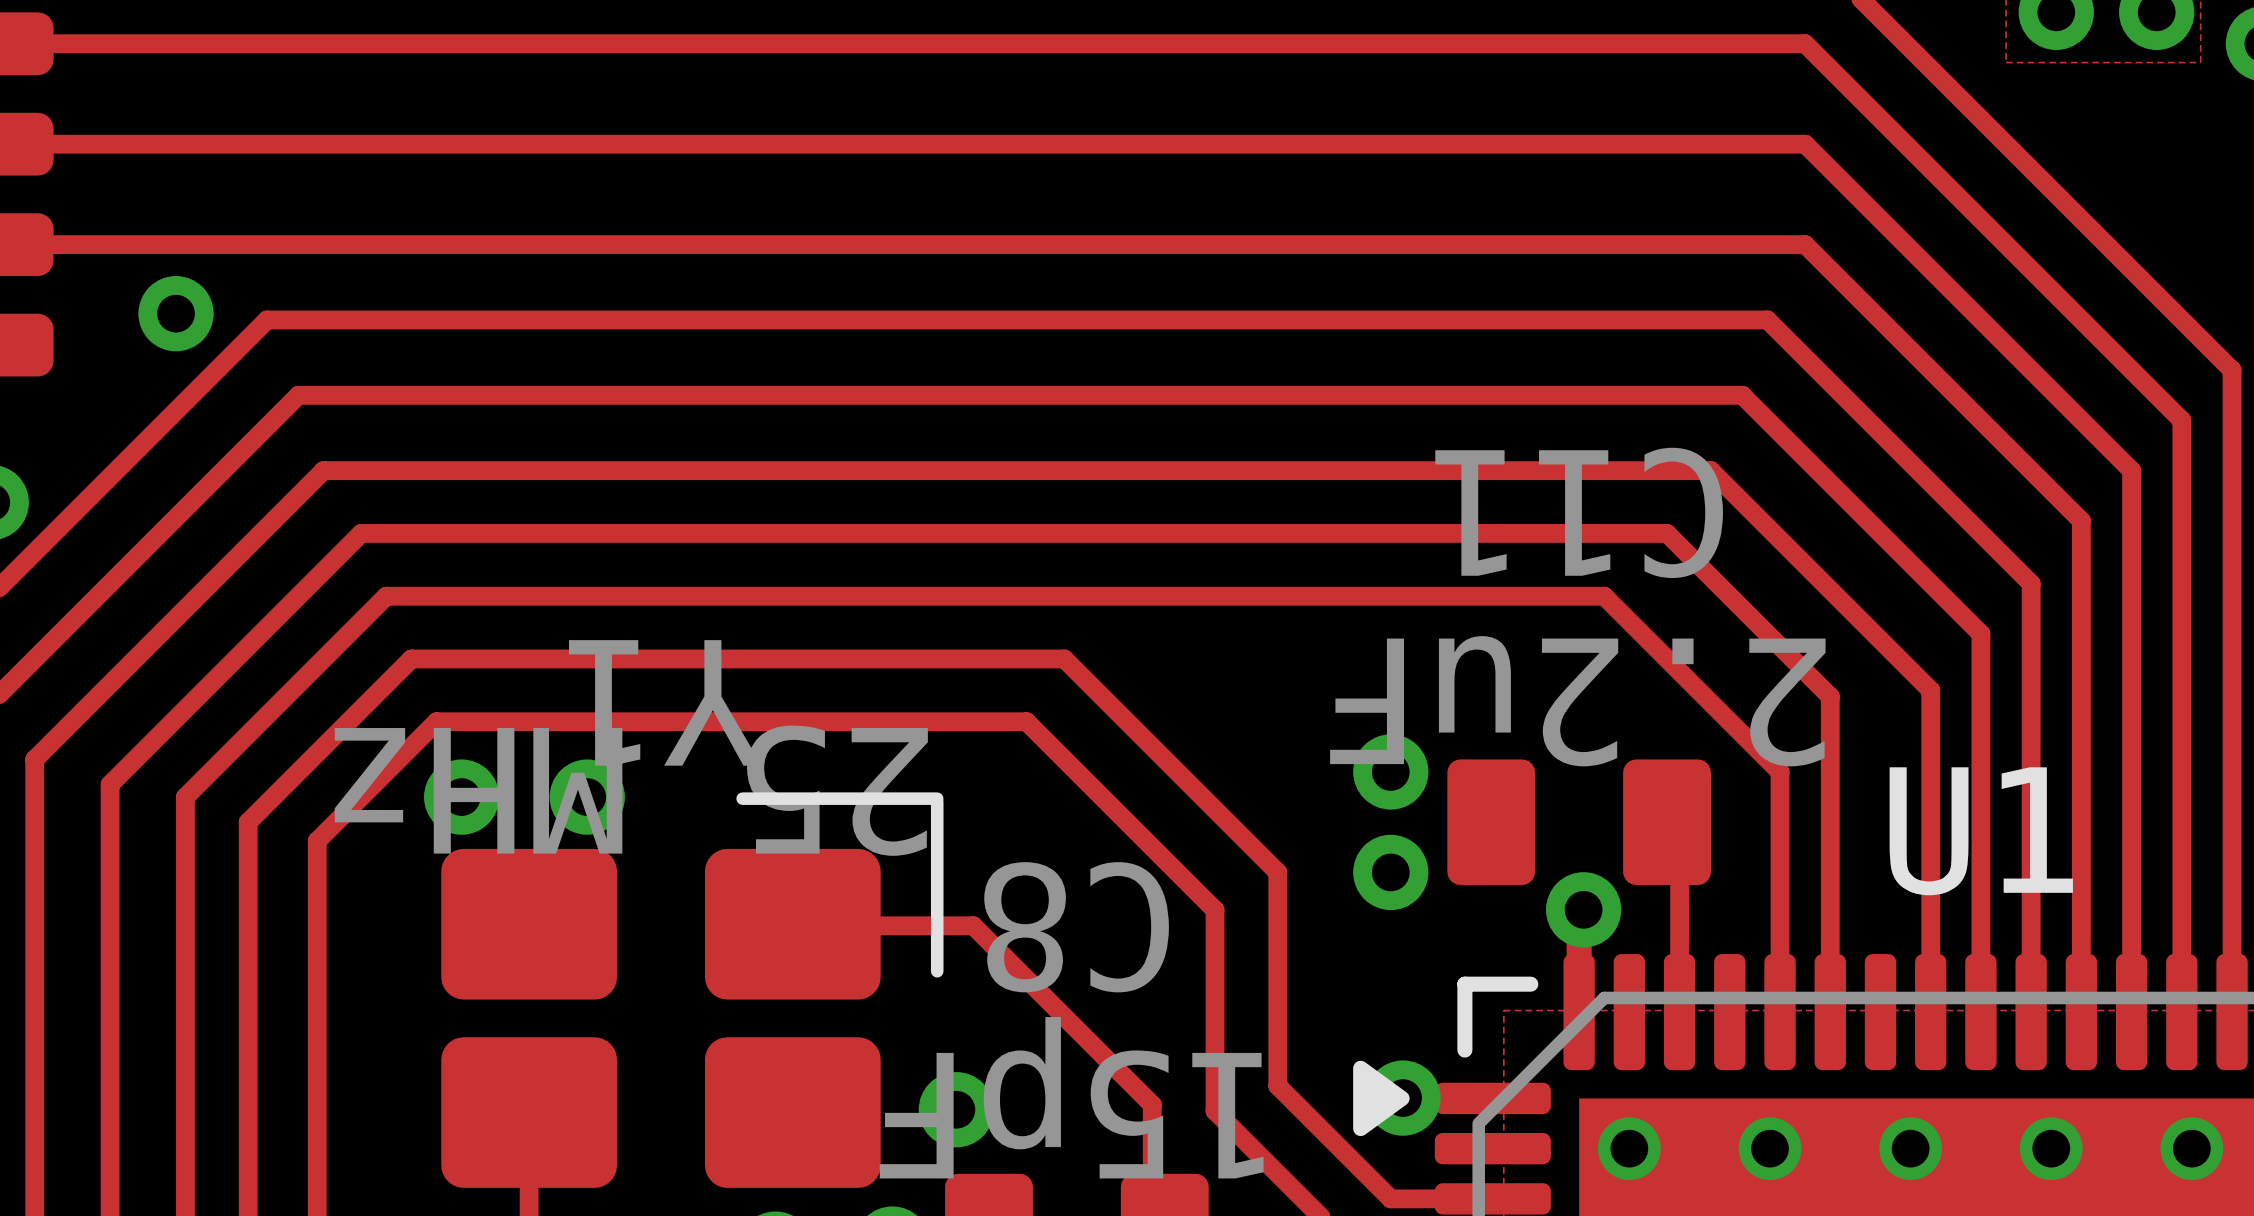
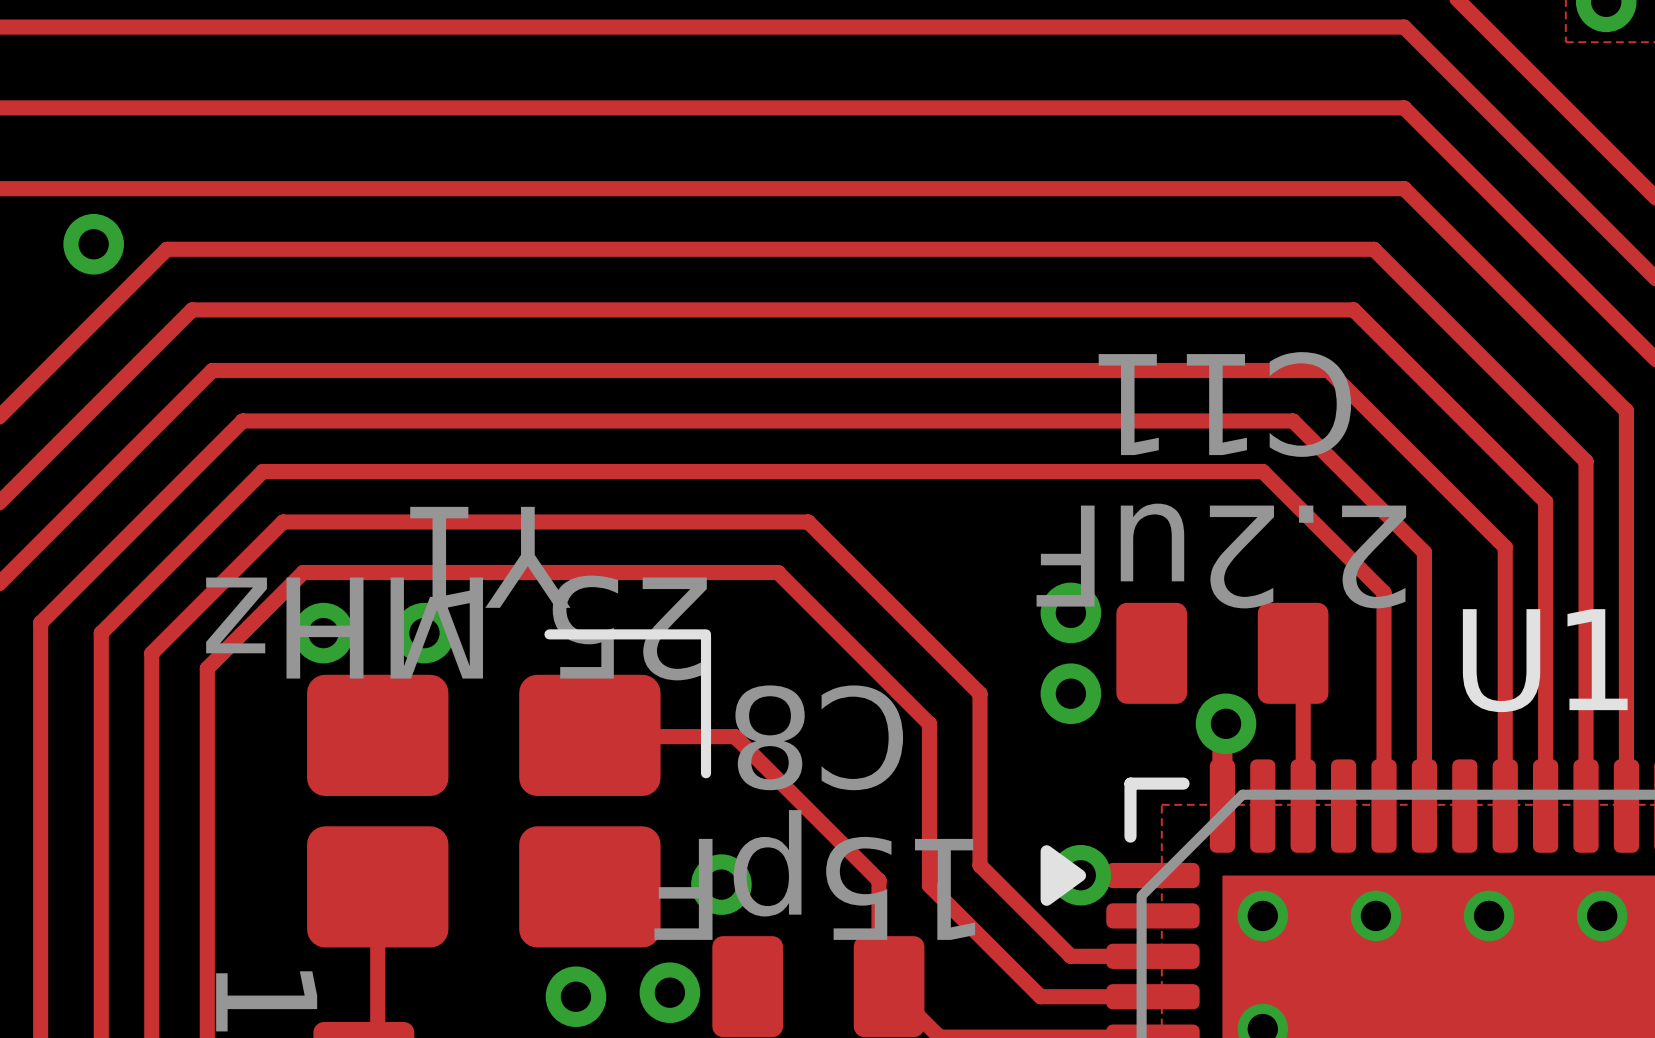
track: (1604, 596) (1780, 771) -> (1242, 471) (1262, 471) (1384, 592) (1384, 612)

